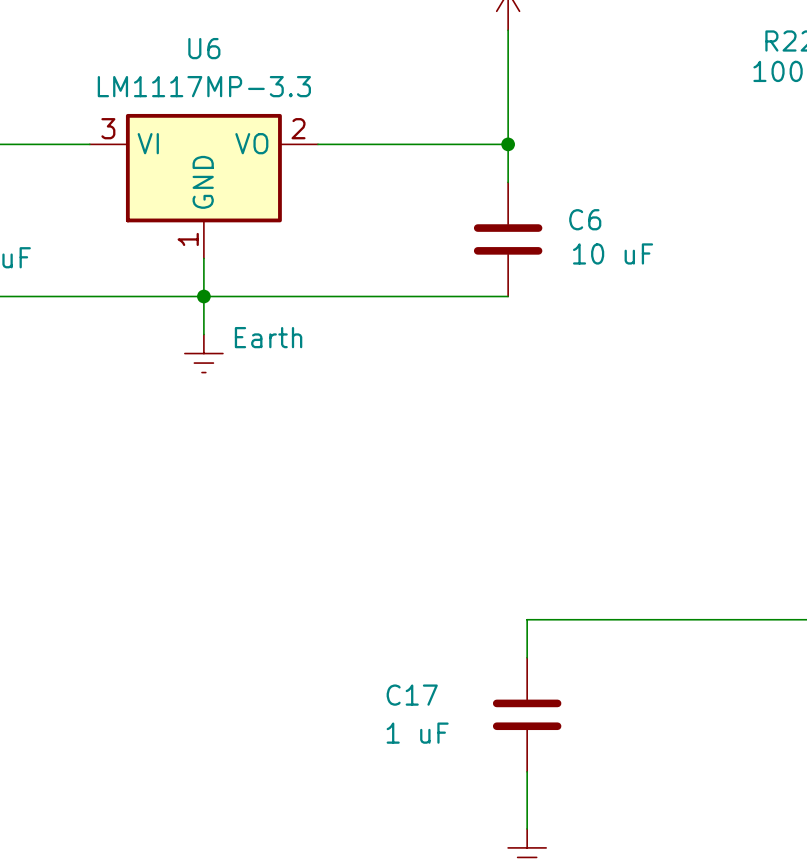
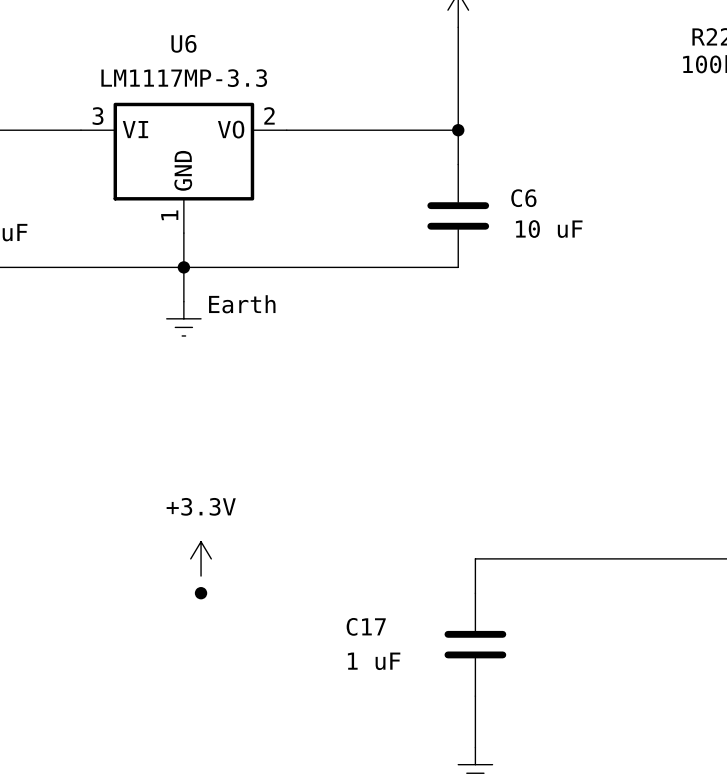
power symbol: none -> +3.3V (201, 558)
junction: none -> (201, 593)

